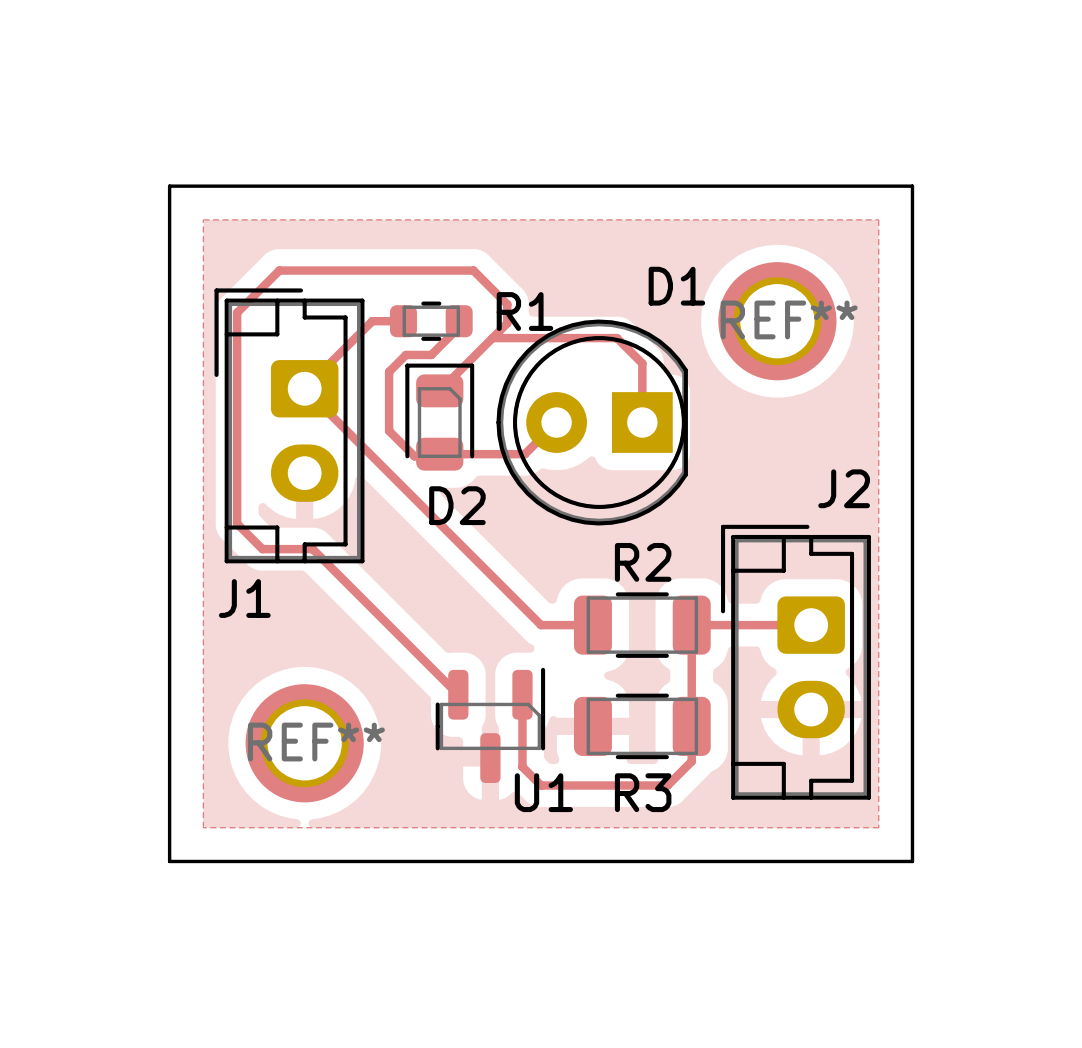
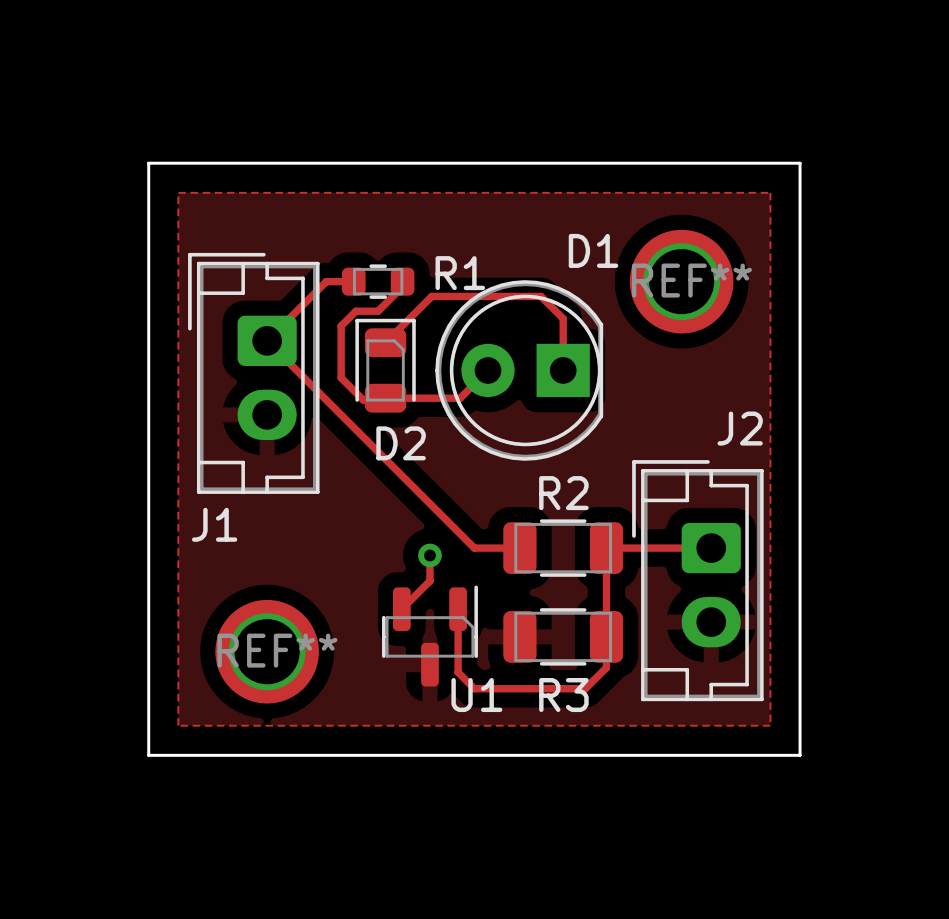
track: (492, 338) (507, 323) (507, 304) (473, 270) (279, 270) (237, 312) (237, 523) (262, 549) (312, 549) (458, 694) -> (429, 555) (429, 581) (401, 609)
via: none -> (429, 555)

